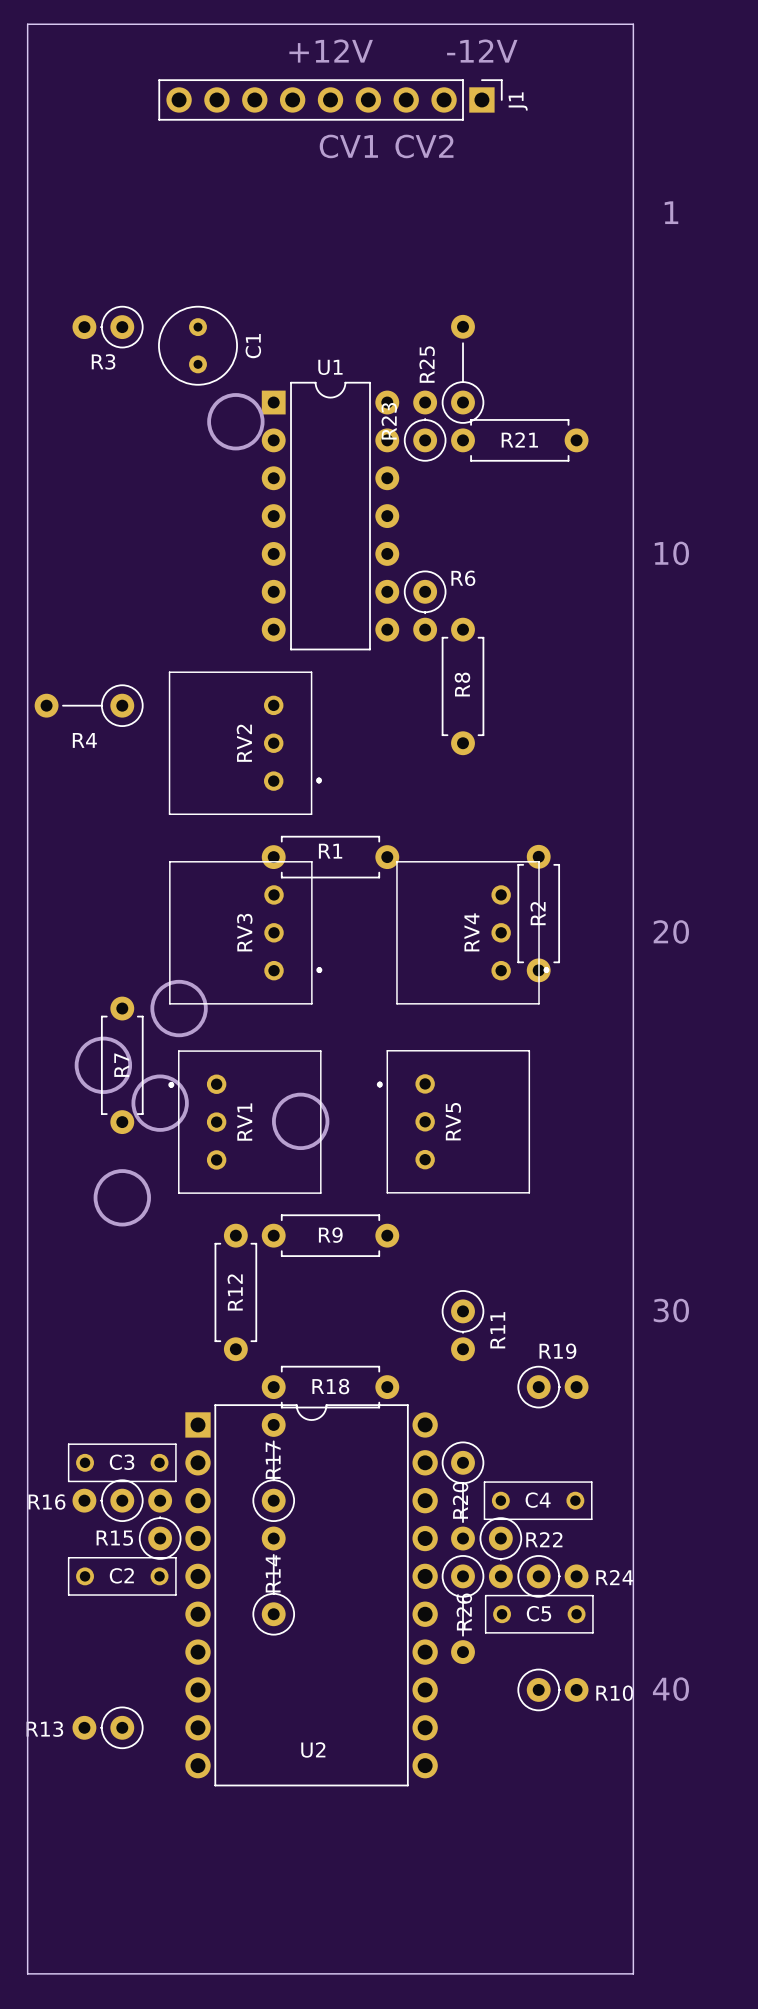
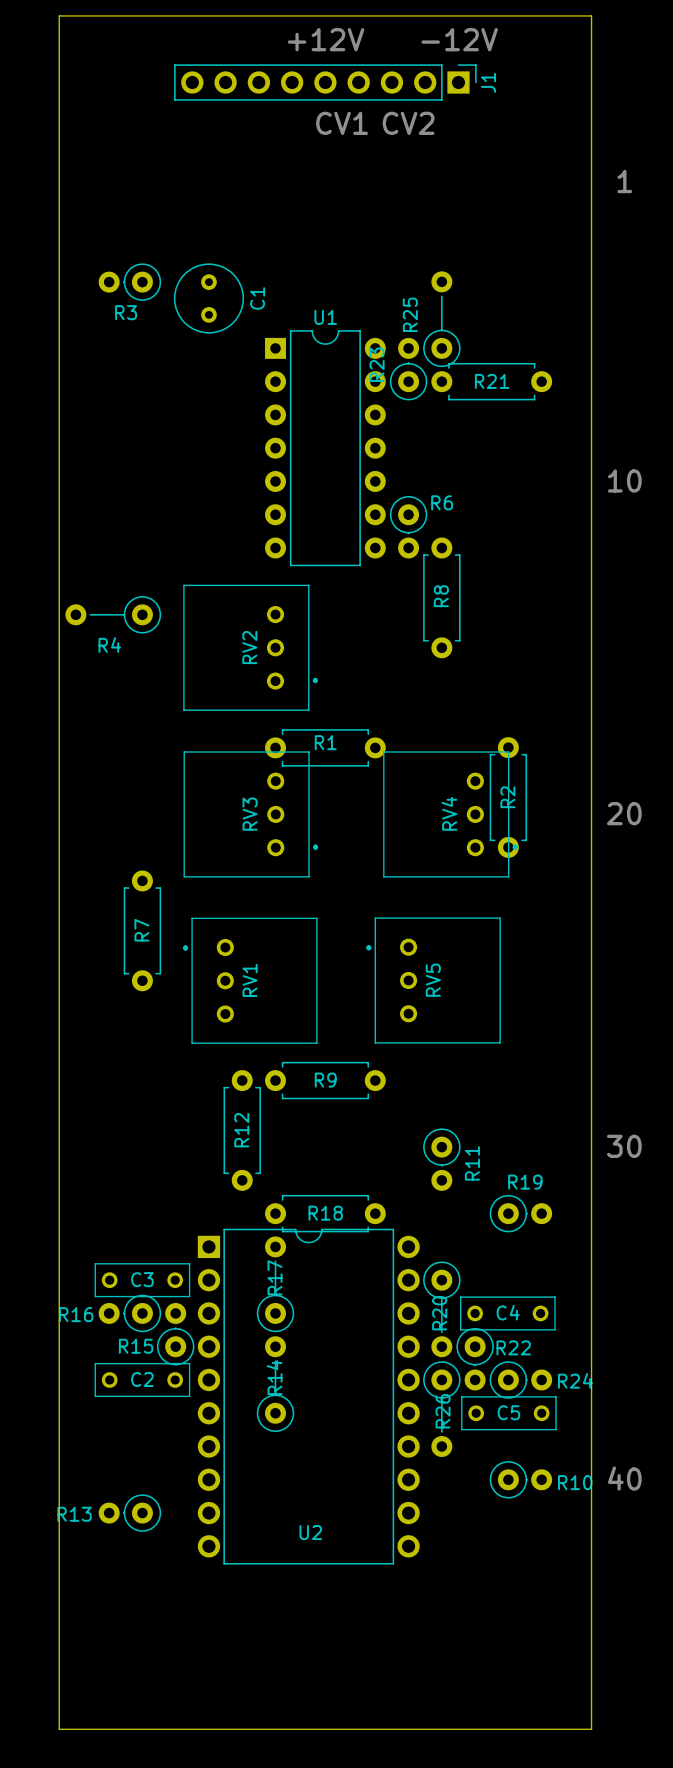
drawing: [207, 393, 265, 451] -> none
drawing: [150, 979, 208, 1038] -> none
drawing: [74, 1036, 189, 1132] -> none
drawing: [272, 1092, 330, 1151] -> none
drawing: [93, 1169, 151, 1227] -> none

